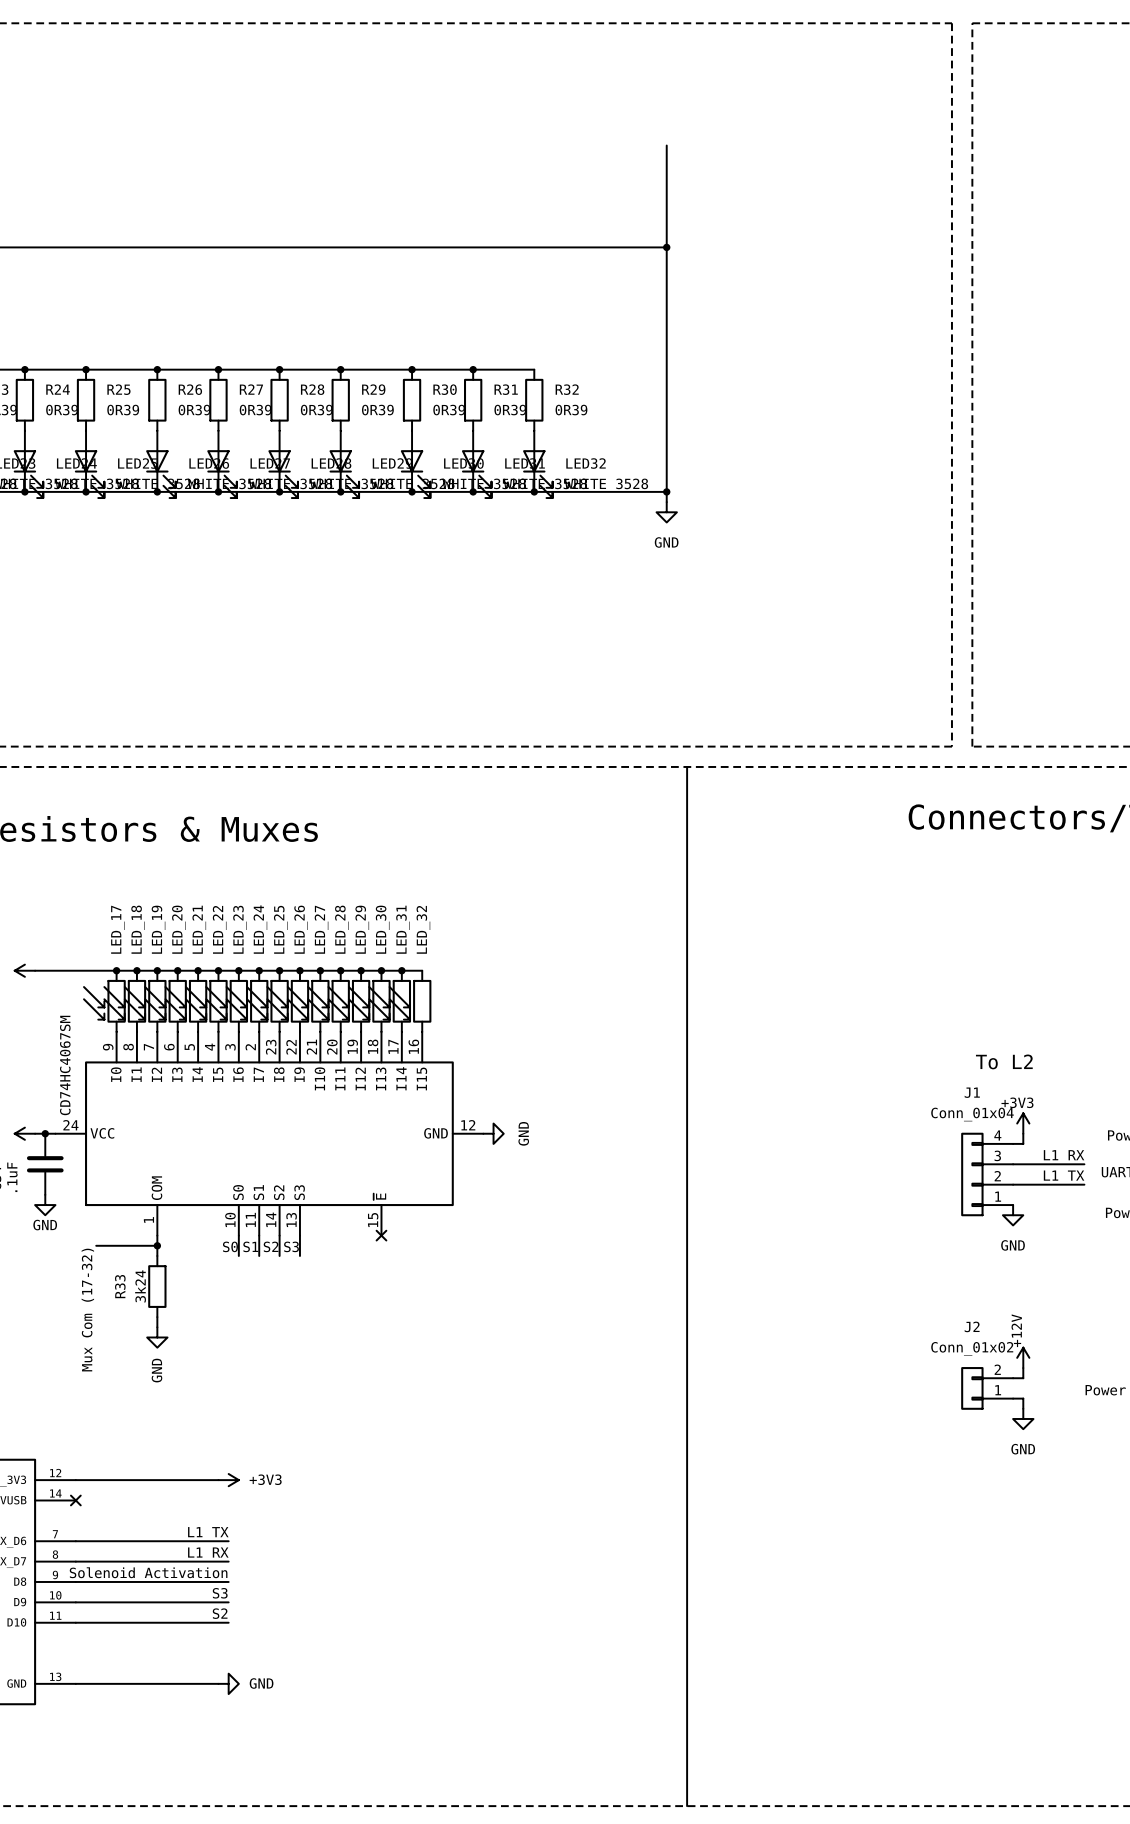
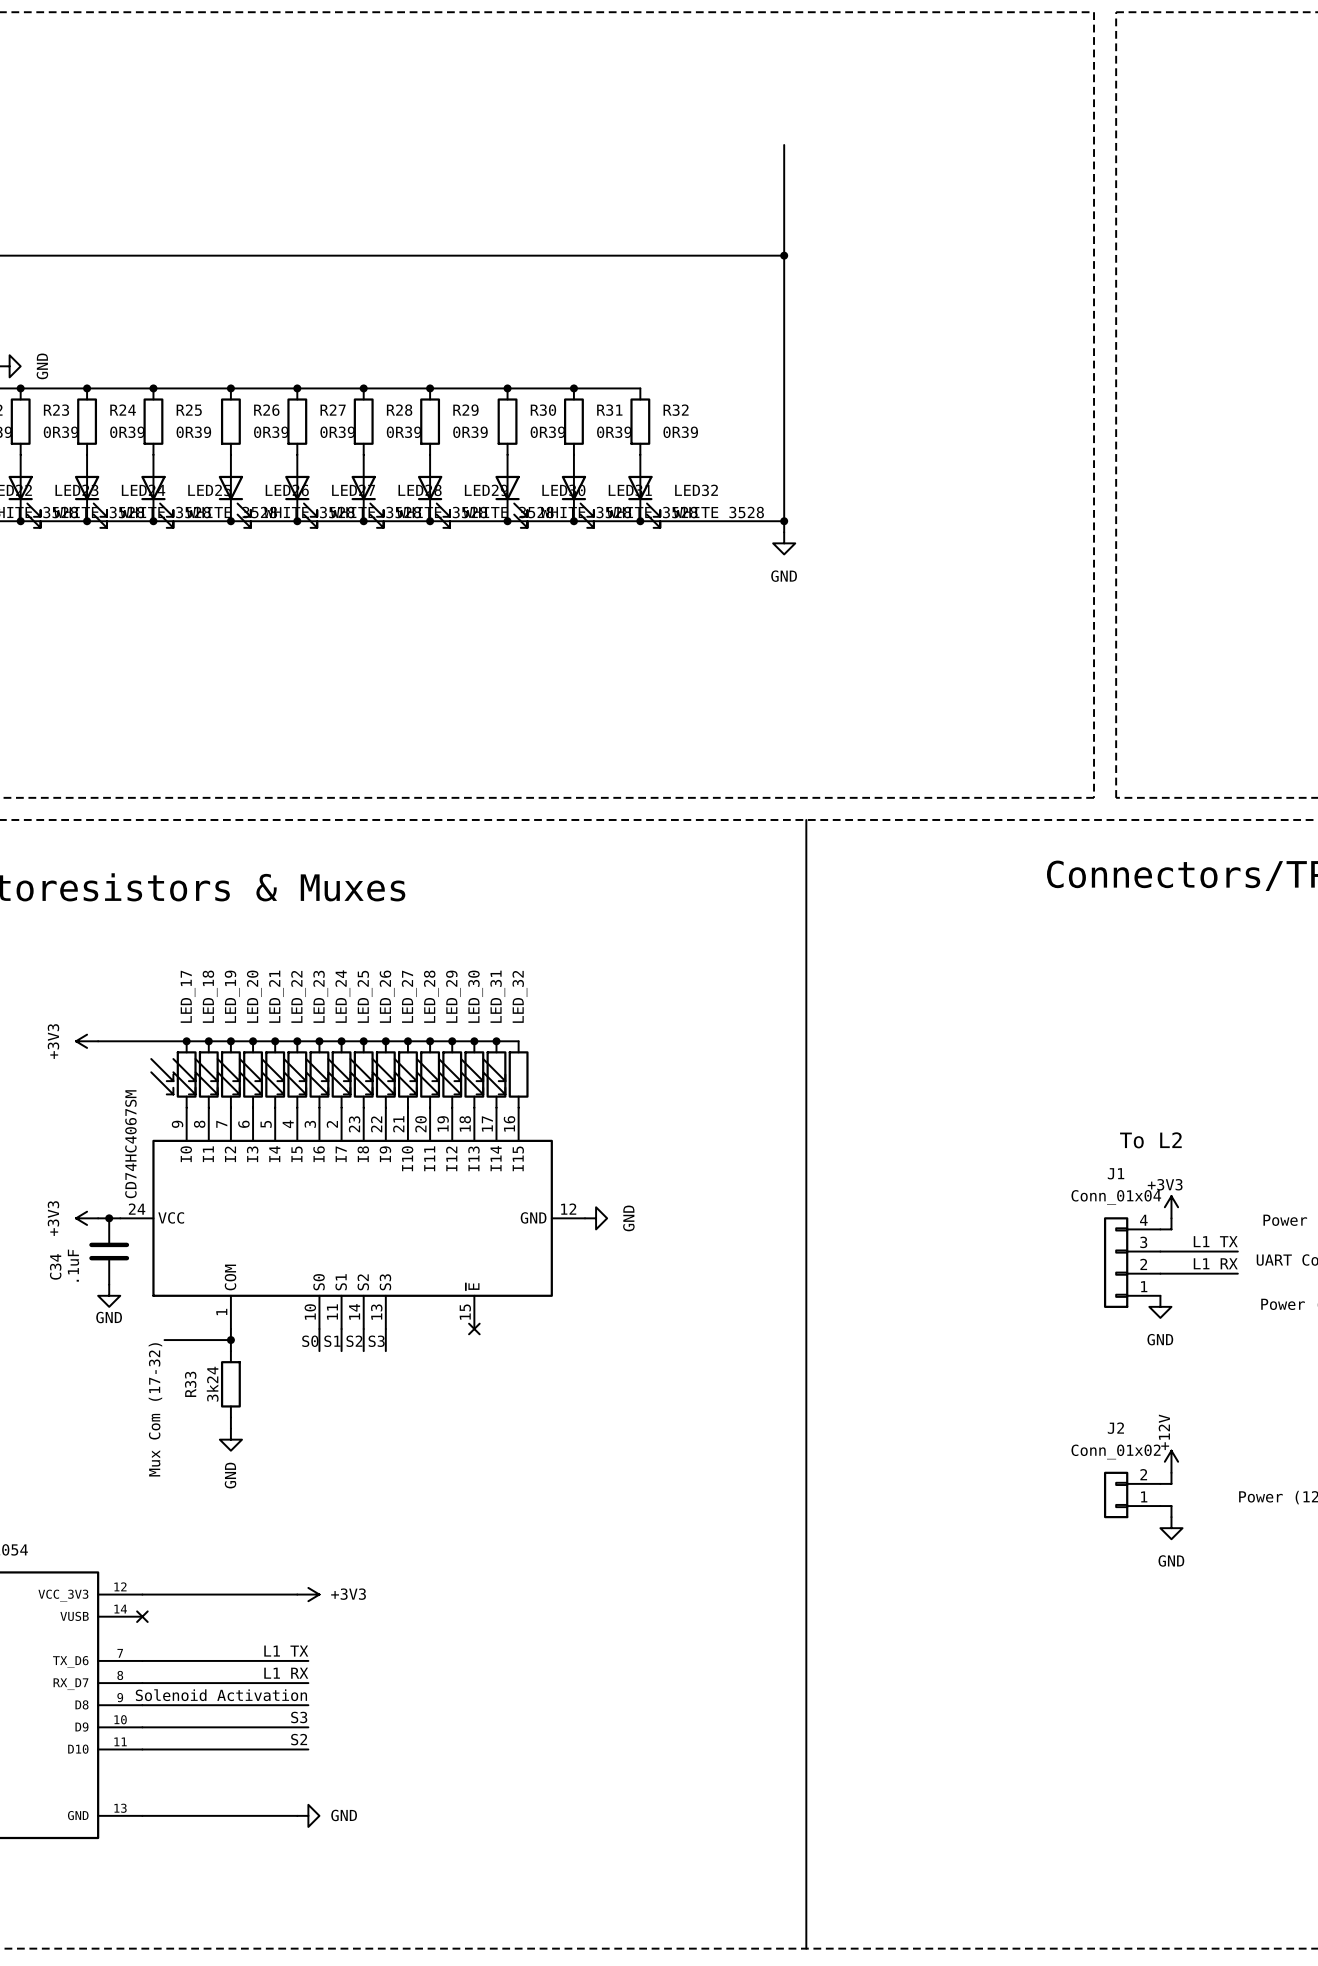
label: L1 RX (1064, 1155) -> L1 TX (1215, 1241)
label: L1 TX (1064, 1175) -> L1 RX (1215, 1263)

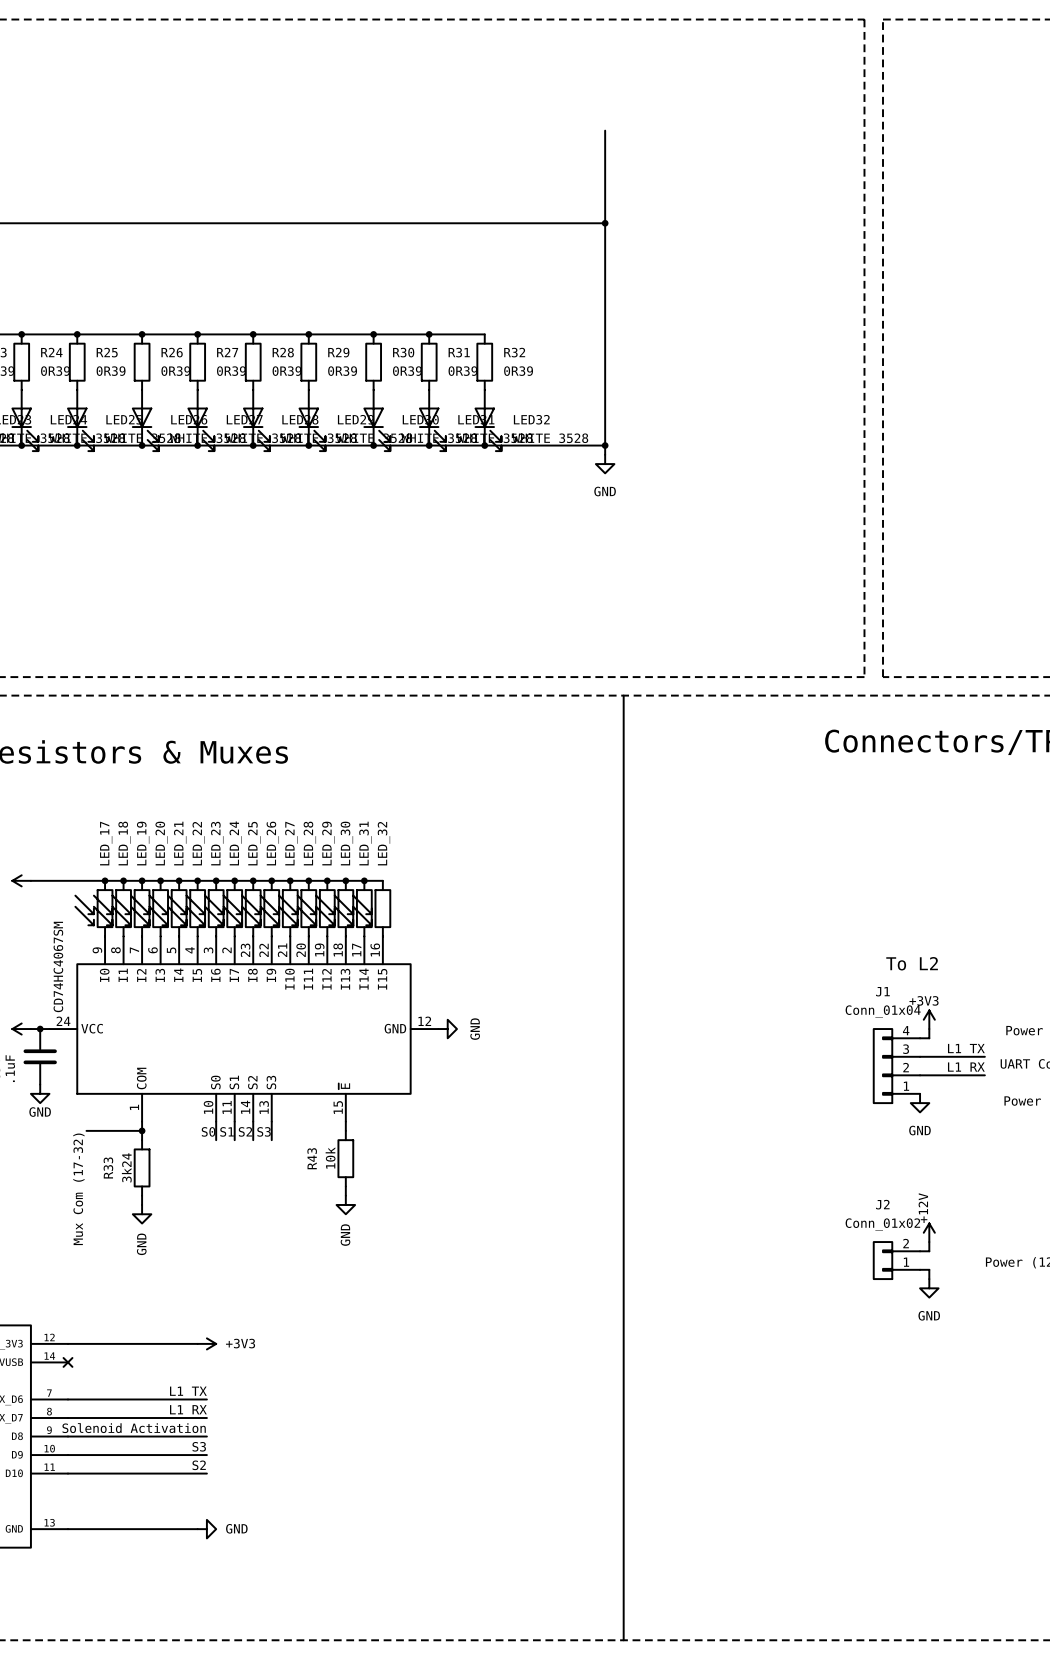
wire: none -> (345, 1121) (345, 1130)
no-connect mark: (474, 1328) -> none
R43: none -> 10k (345, 1158)
wire: none -> (345, 1186) (345, 1195)
power symbol: none -> GND (345, 1204)

